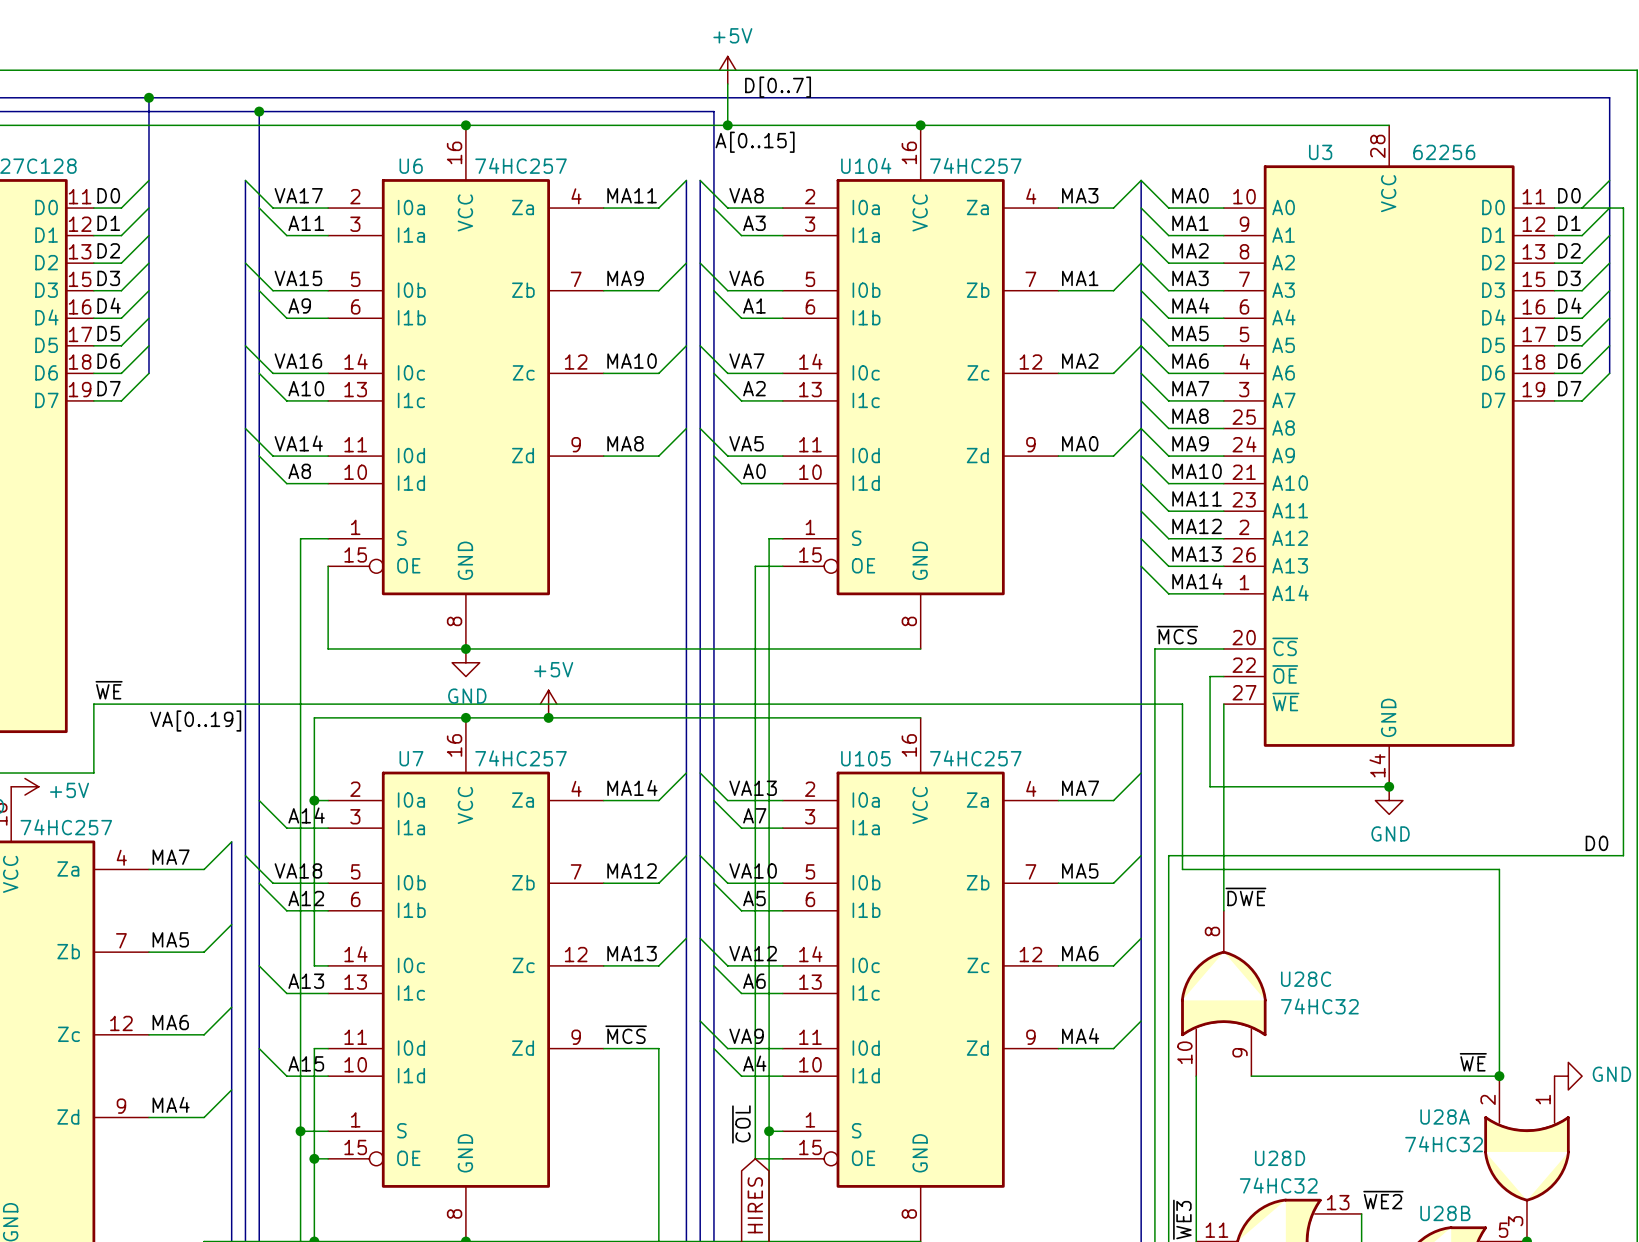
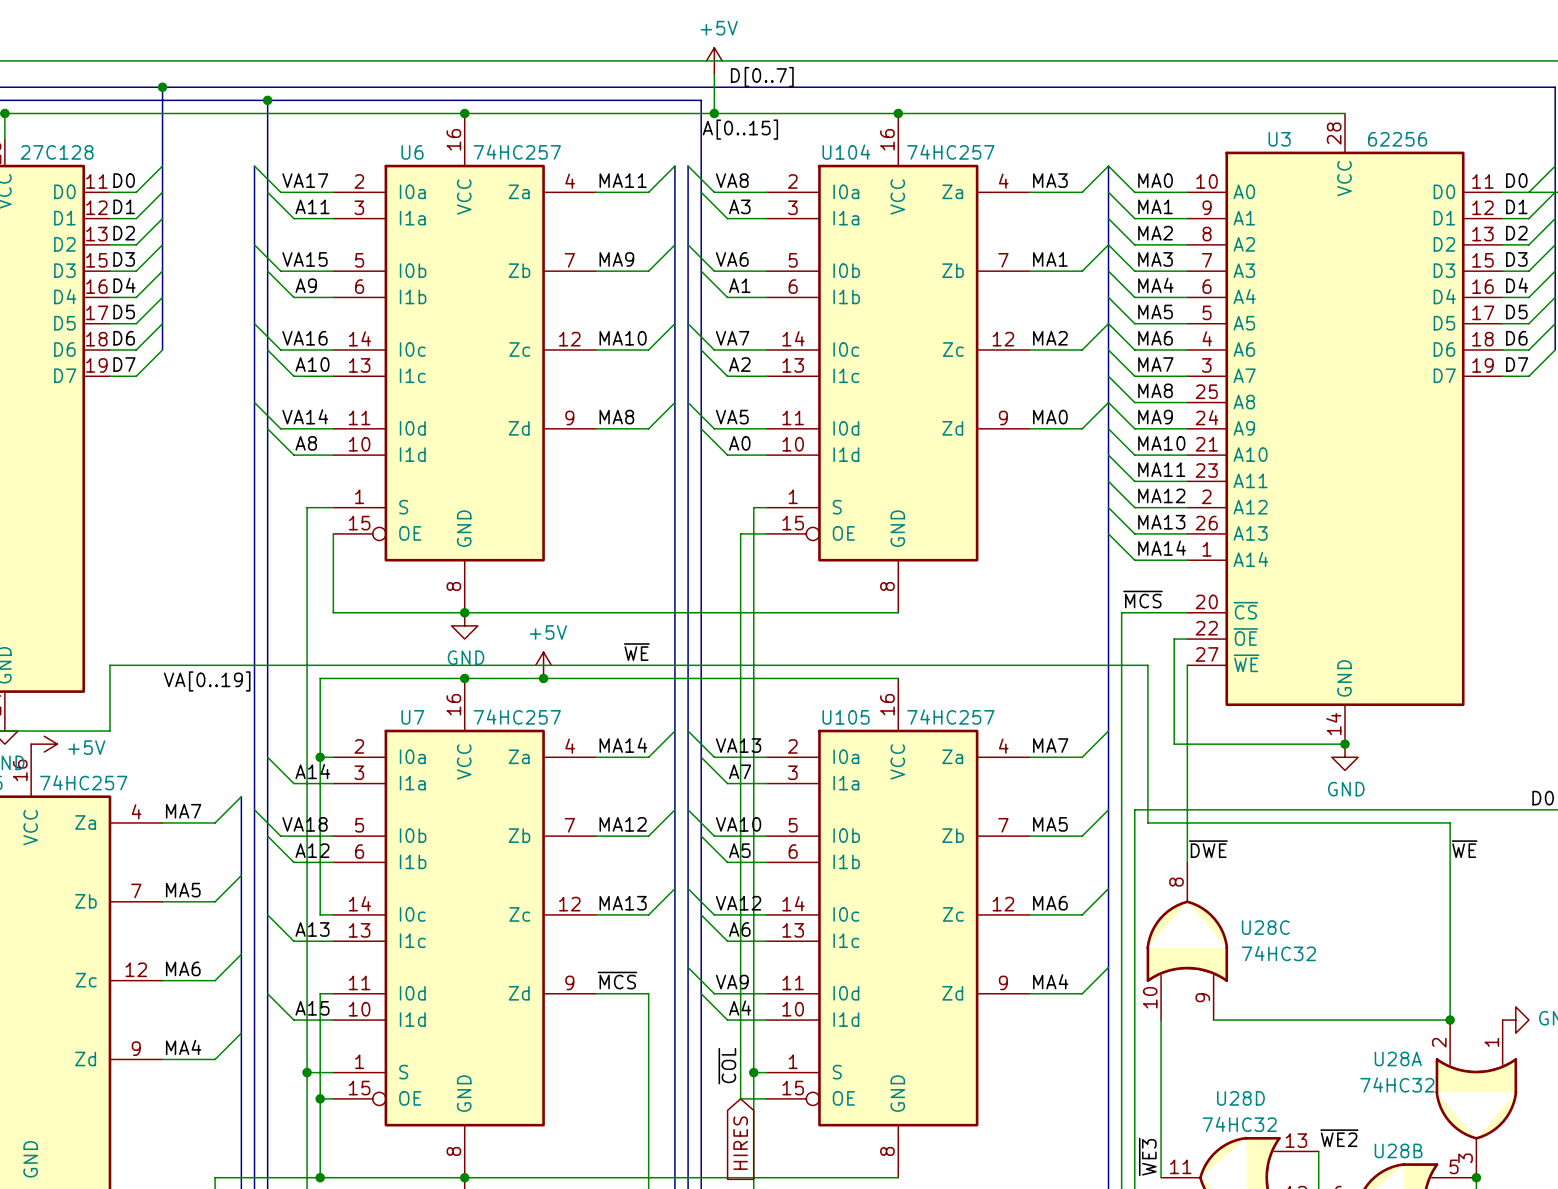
label: ~{WE} (109, 690) -> none
label: none -> ~{WE} (636, 652)
label position: ~{WE} (1473, 1062) -> ~{WE} (1464, 849)

